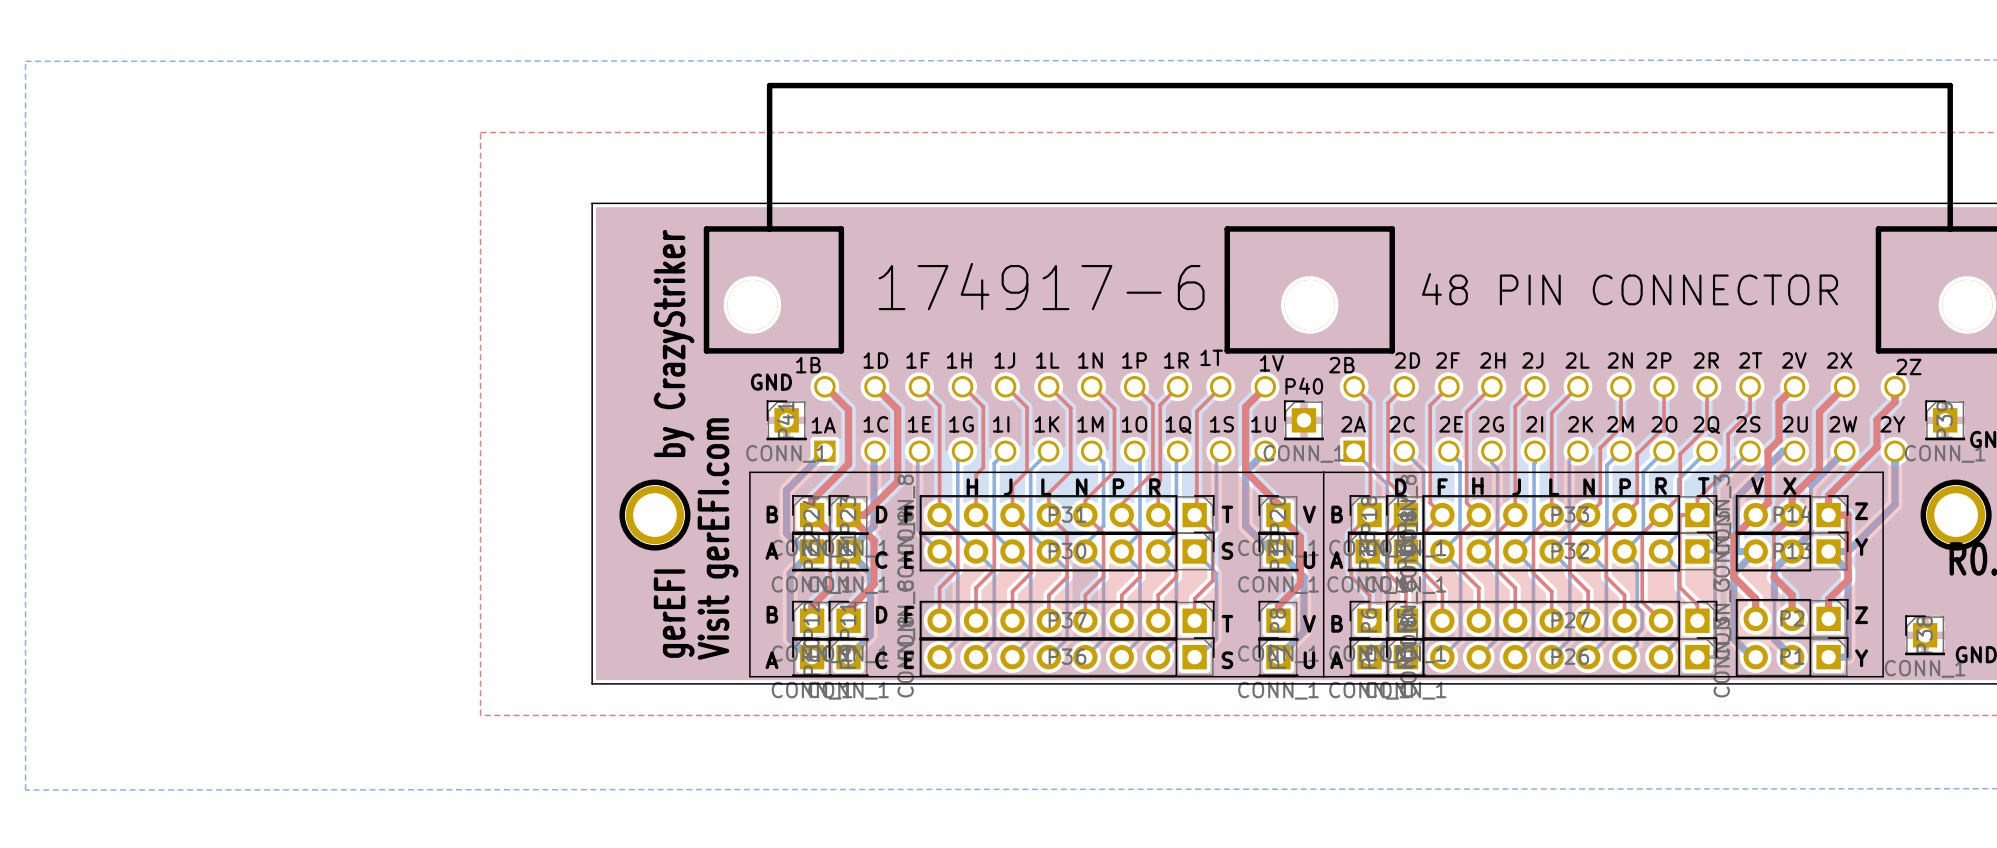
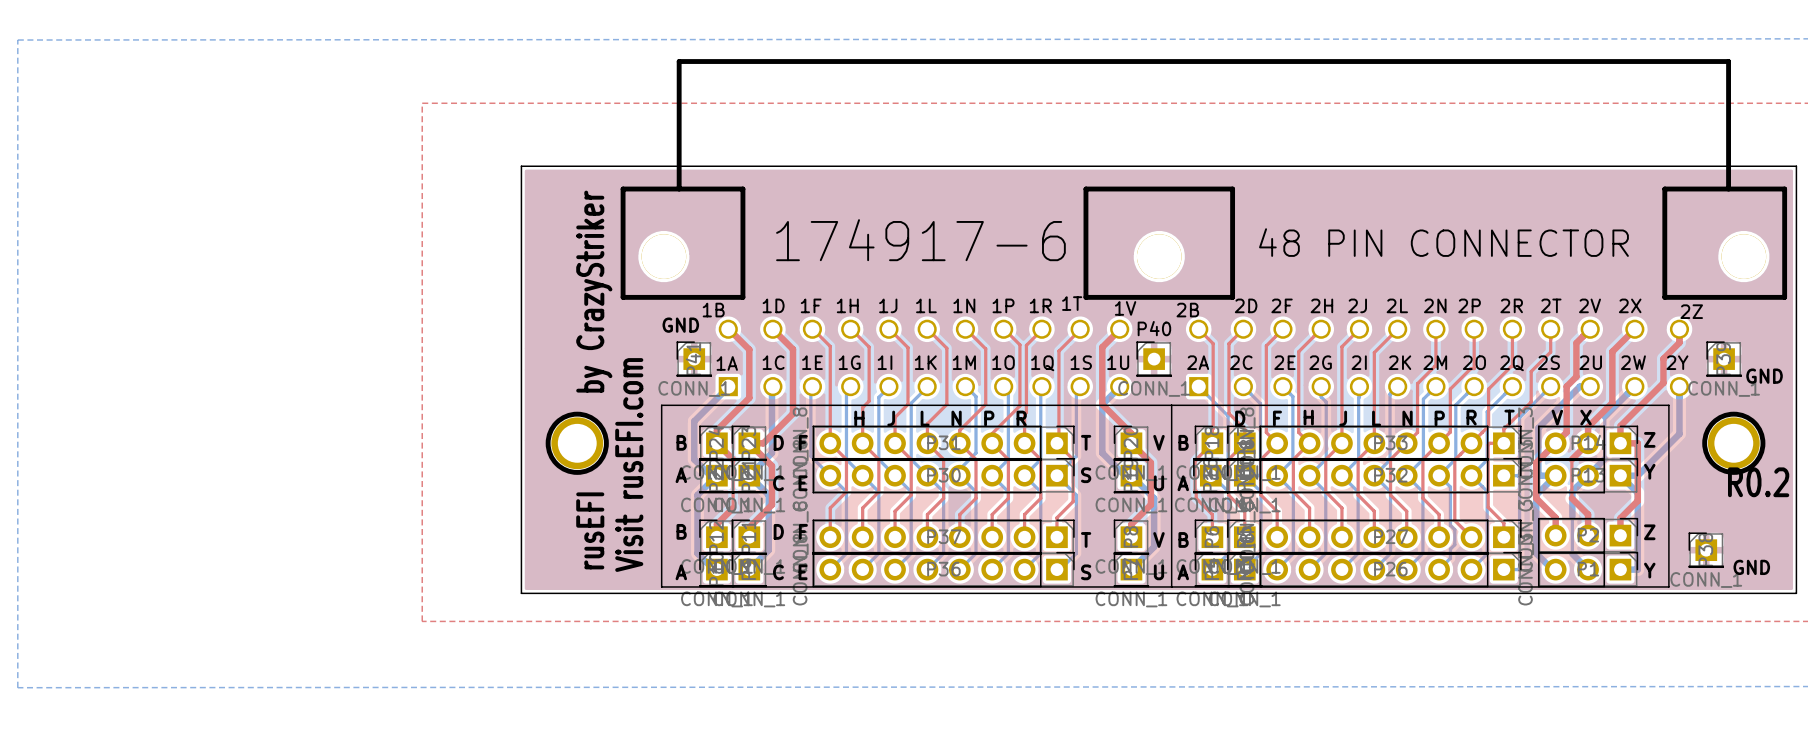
text: gerEFI by CrazyStriker (674, 443) -> rusEFI by CrazyStriker (594, 380)
text: Visit gerEFI.com (718, 539) -> Visit rusEFI.com (629, 465)

